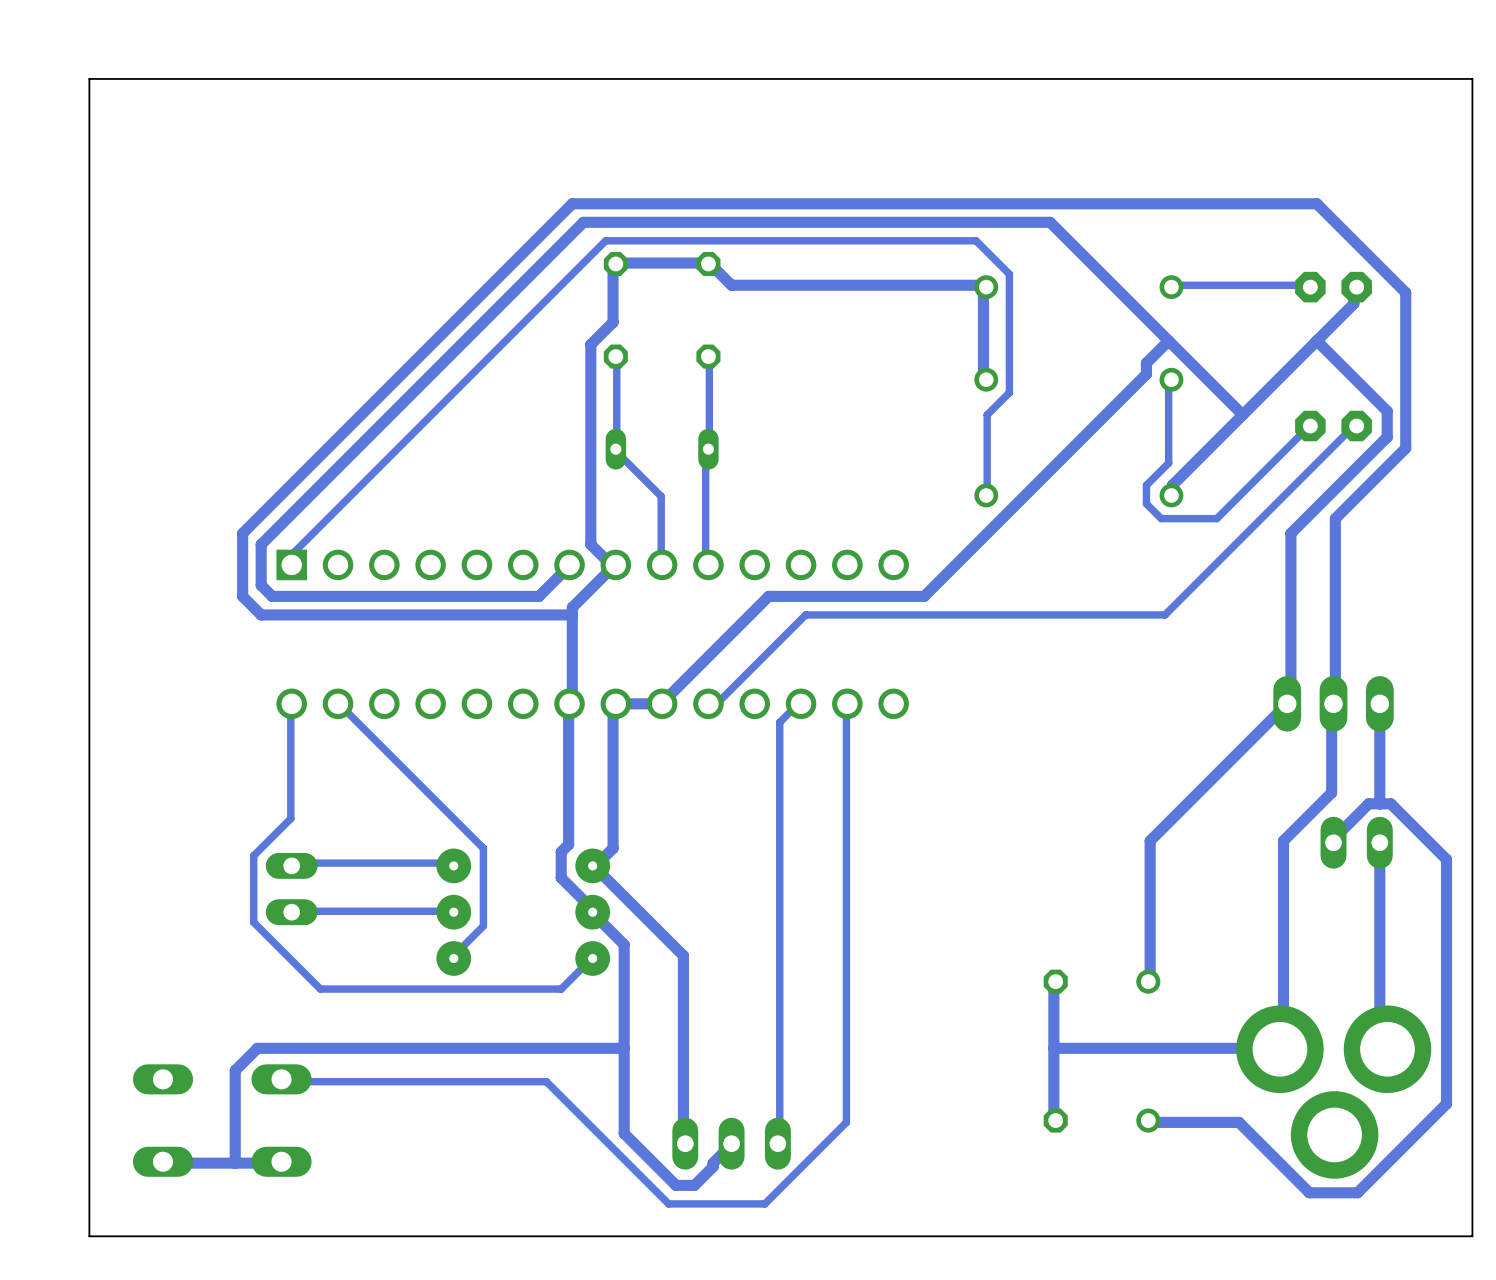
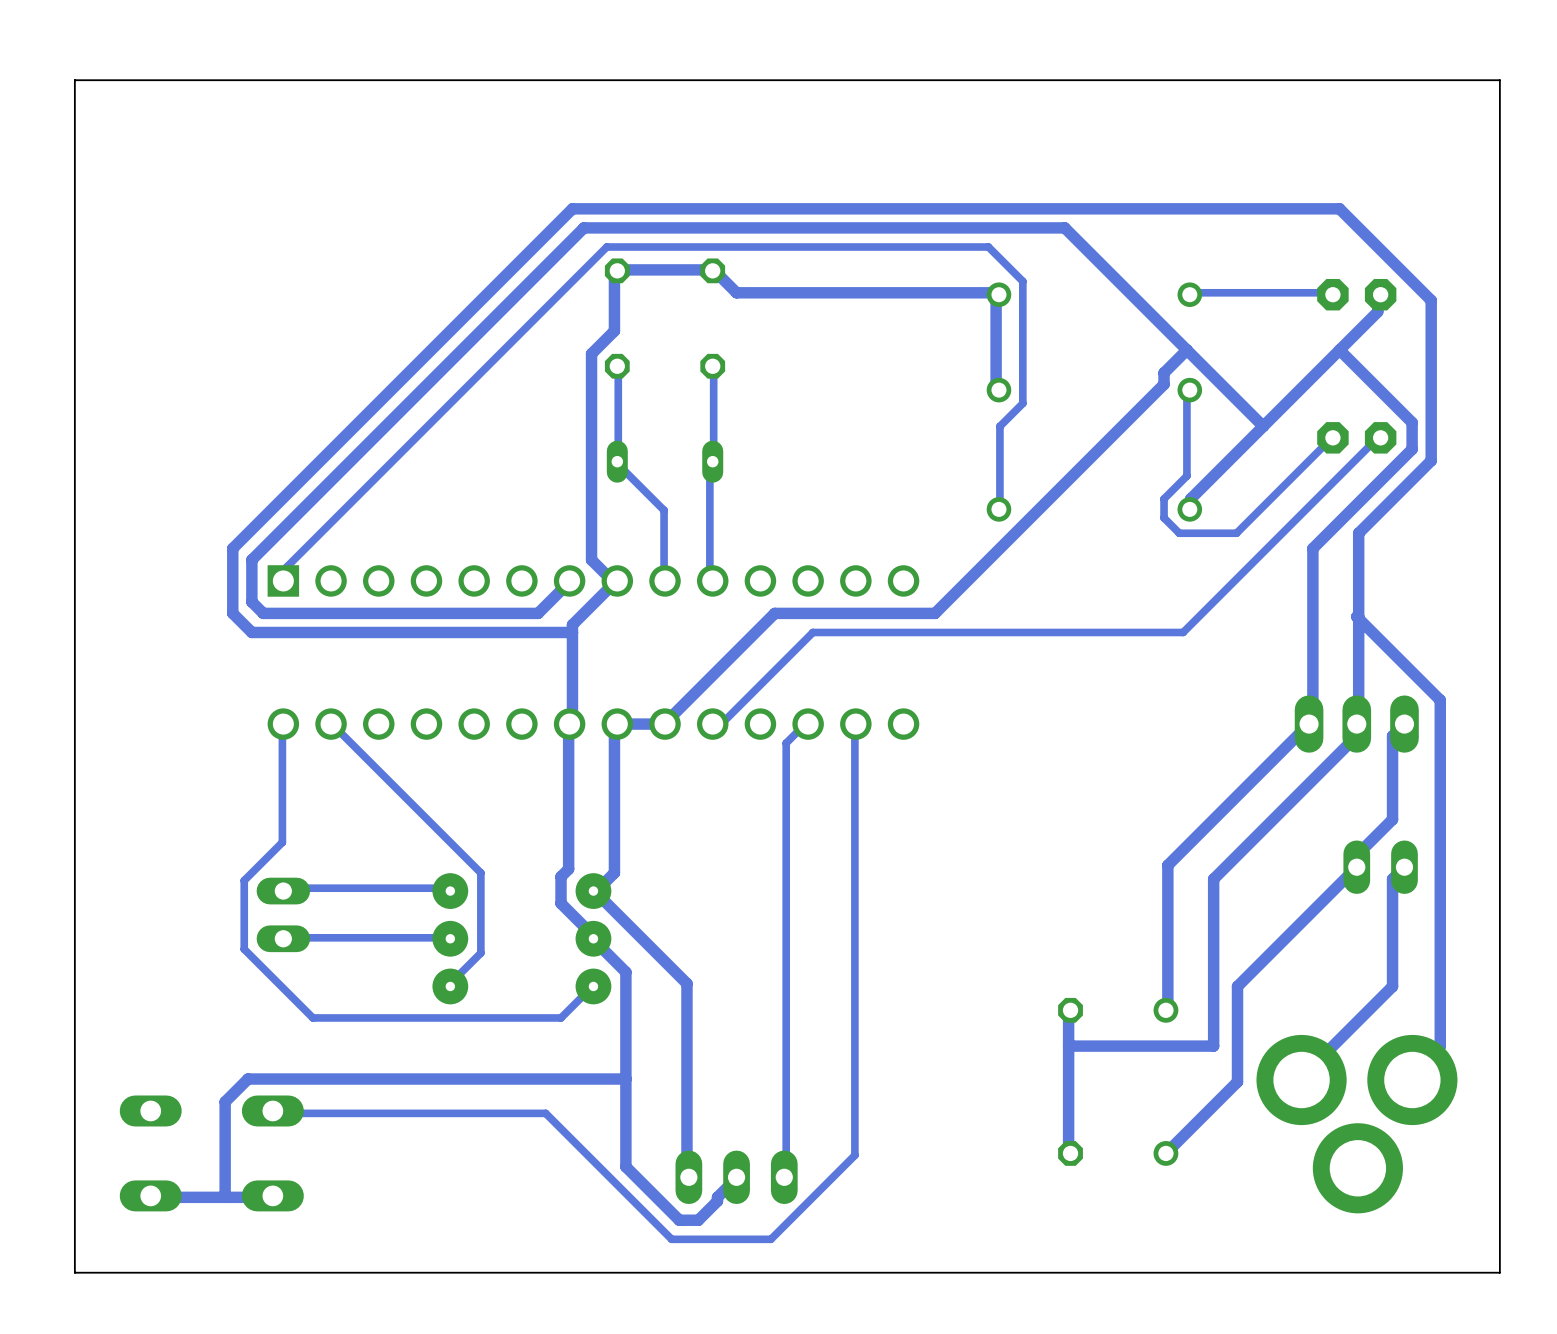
track: none -> (1358, 616) (1356, 616) (1440, 700) (1440, 1046) (1416, 1069) (1412, 1080)
track: (1331, 703) (1331, 792) (1283, 840) (1283, 1048) (1053, 1048) -> none
track: none -> (1356, 724) (1356, 736) (1213, 879) (1213, 1046) (1068, 1046)
track: (1379, 703) (1379, 803) -> (1404, 724) (1392, 736) (1392, 819) (1356, 855) (1356, 867) (1237, 986) (1237, 1081) (1165, 1153)
track: (1331, 840) (1368, 803) (1390, 803) (1446, 859) (1446, 1103) (1357, 1192) (1309, 1192) (1239, 1122) (1150, 1122) -> none
track: (1379, 842) (1379, 1040) (1387, 1049) -> (1404, 867) (1392, 879) (1392, 986) (1309, 1069) (1301, 1080)

